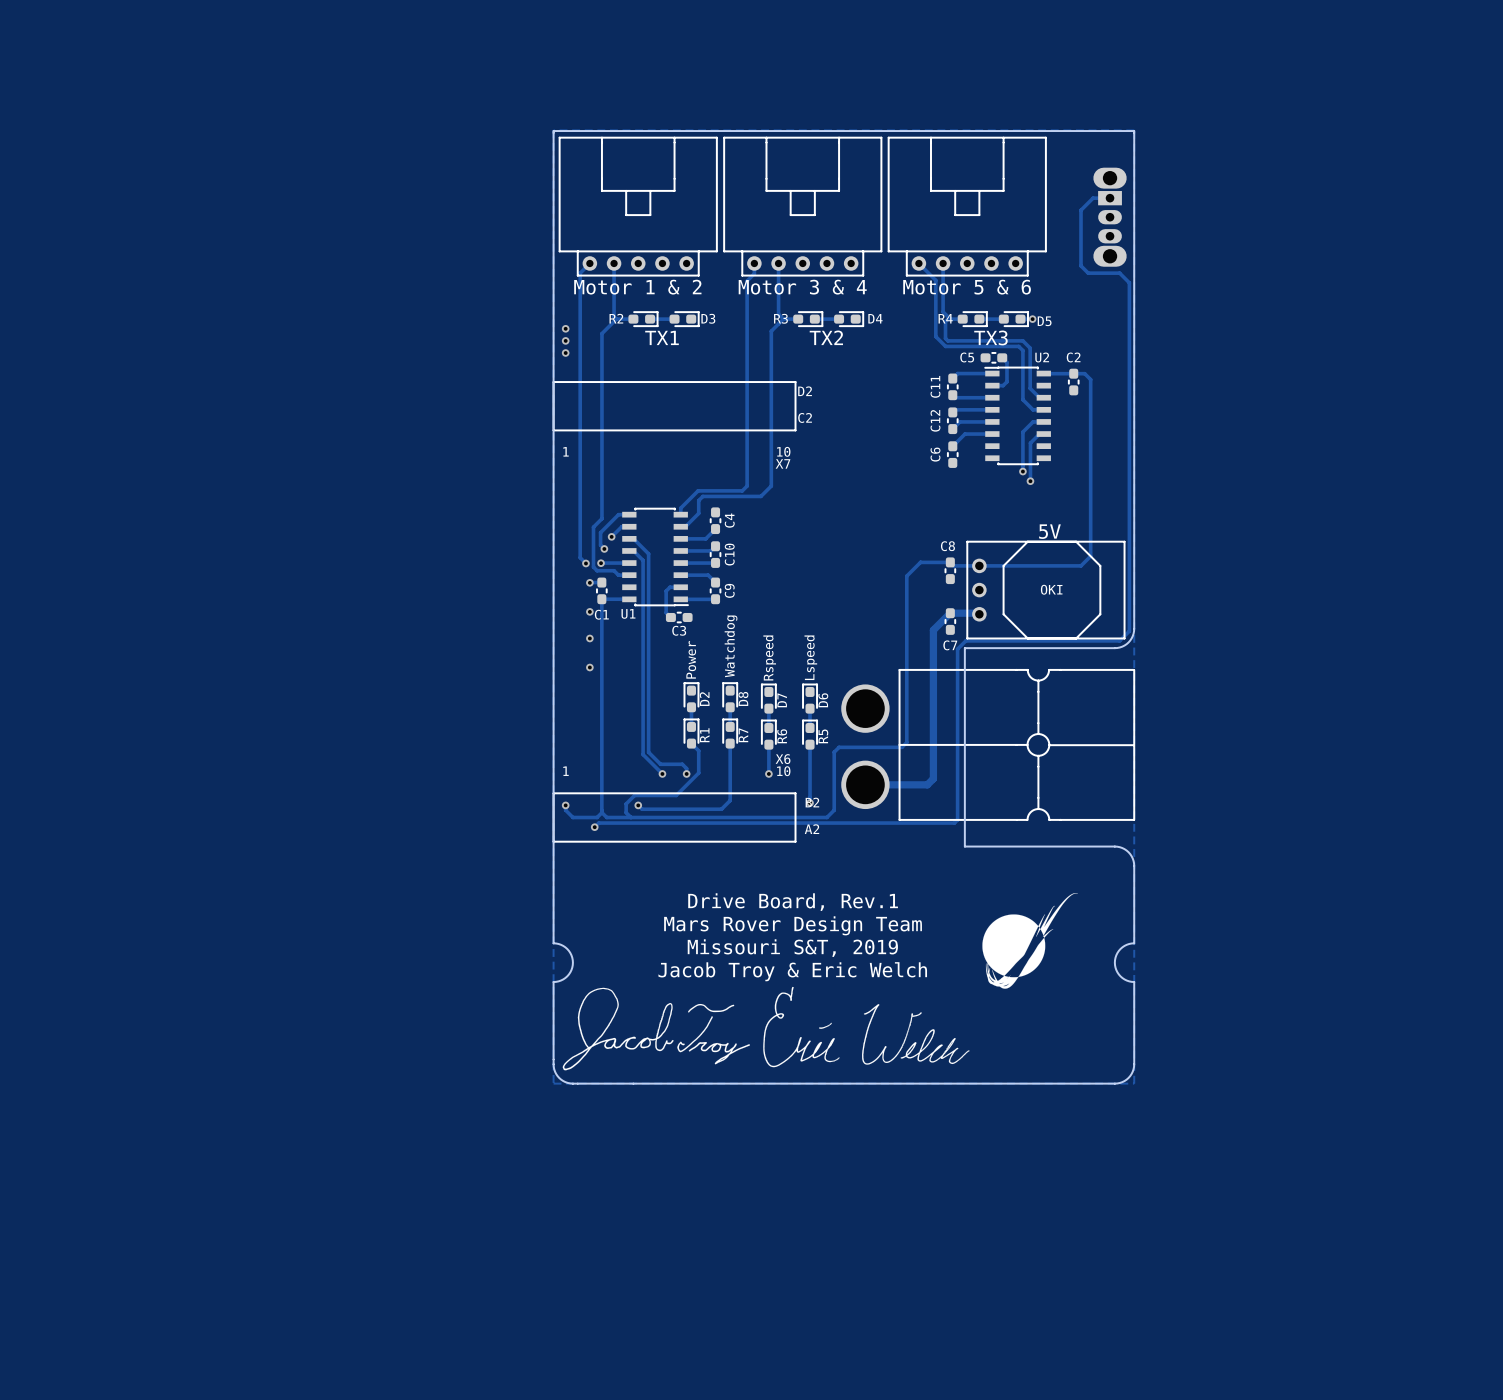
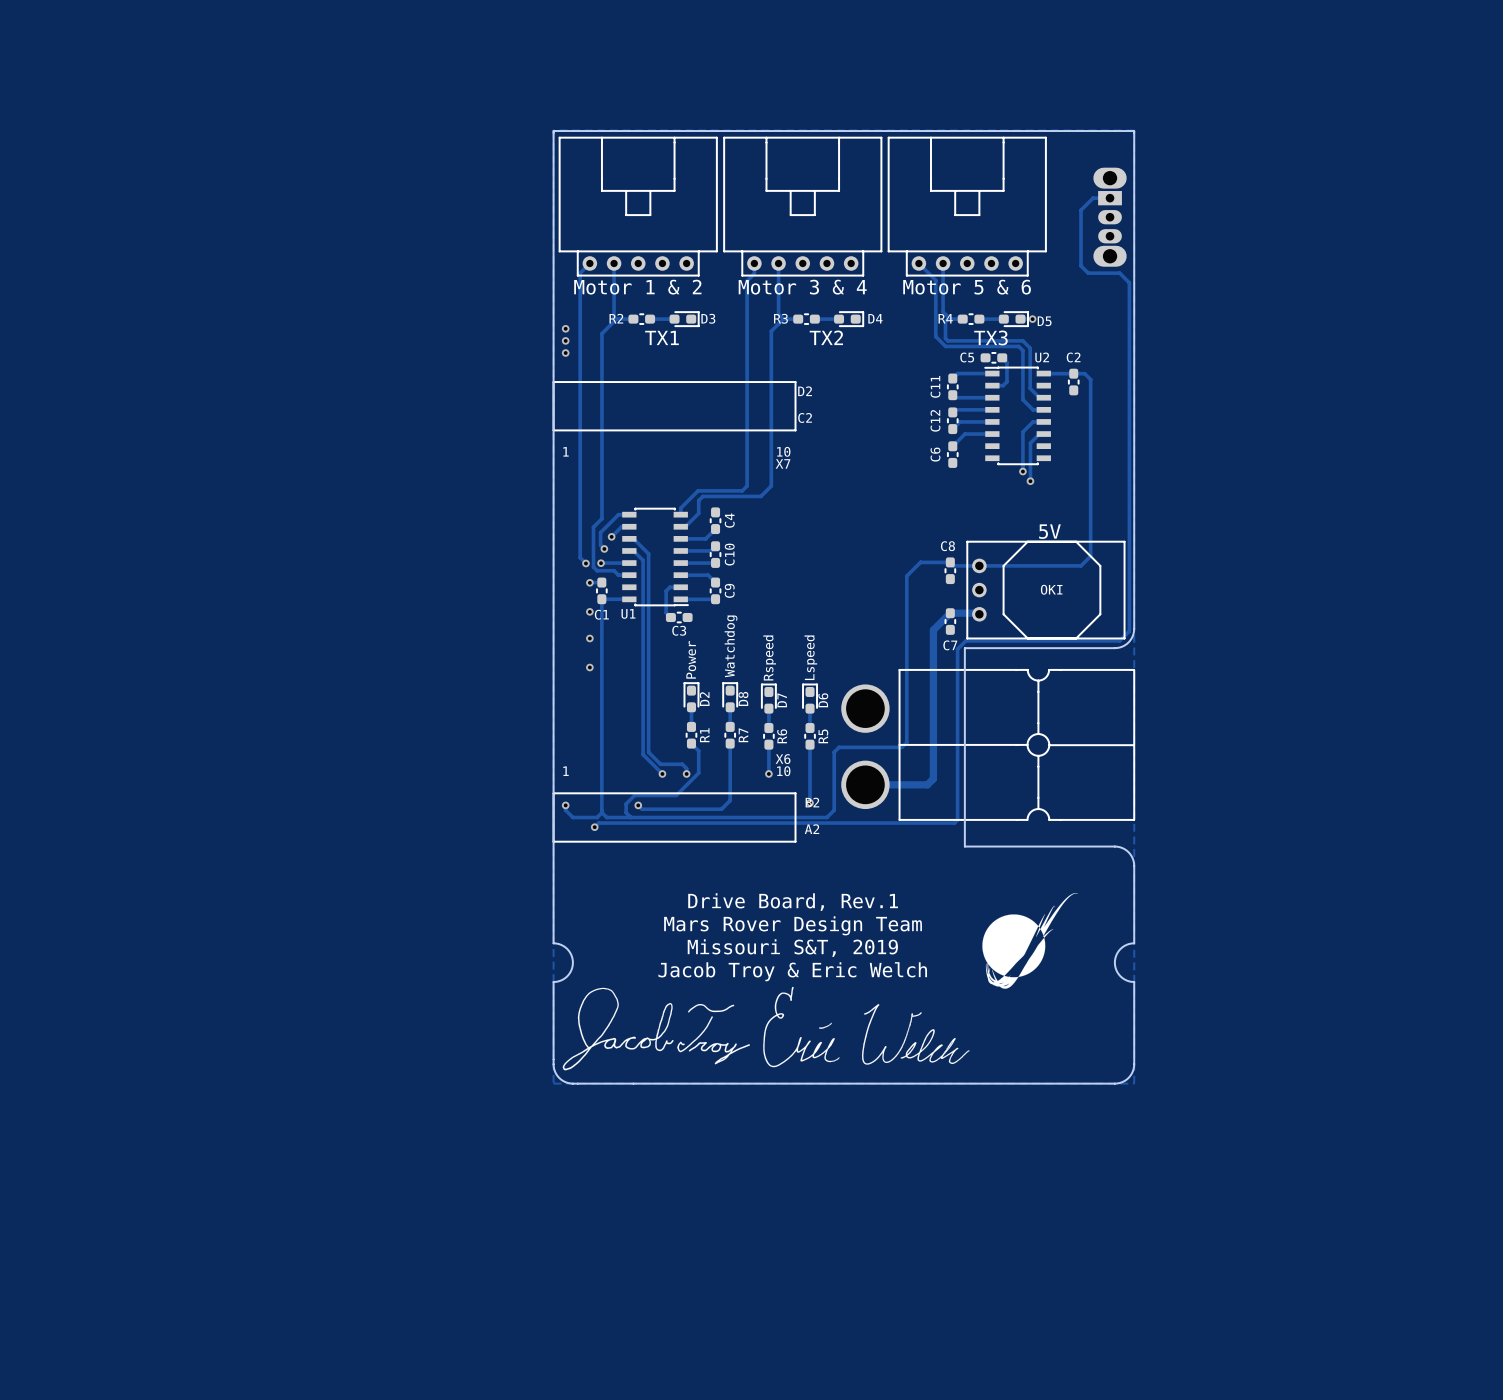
R2 footprint: [628, 311, 659, 327] -> [628, 313, 656, 325]
R3 footprint: [793, 311, 823, 327] -> [793, 313, 820, 325]
R4 footprint: [957, 311, 988, 327] -> [957, 313, 985, 325]
R1 footprint: [683, 718, 700, 749] -> [686, 721, 697, 749]
R7 footprint: [722, 718, 738, 749] -> [724, 721, 736, 749]
R6 footprint: [761, 719, 777, 750] -> [763, 722, 775, 750]
R5 footprint: [802, 719, 818, 750] -> [804, 722, 816, 750]

